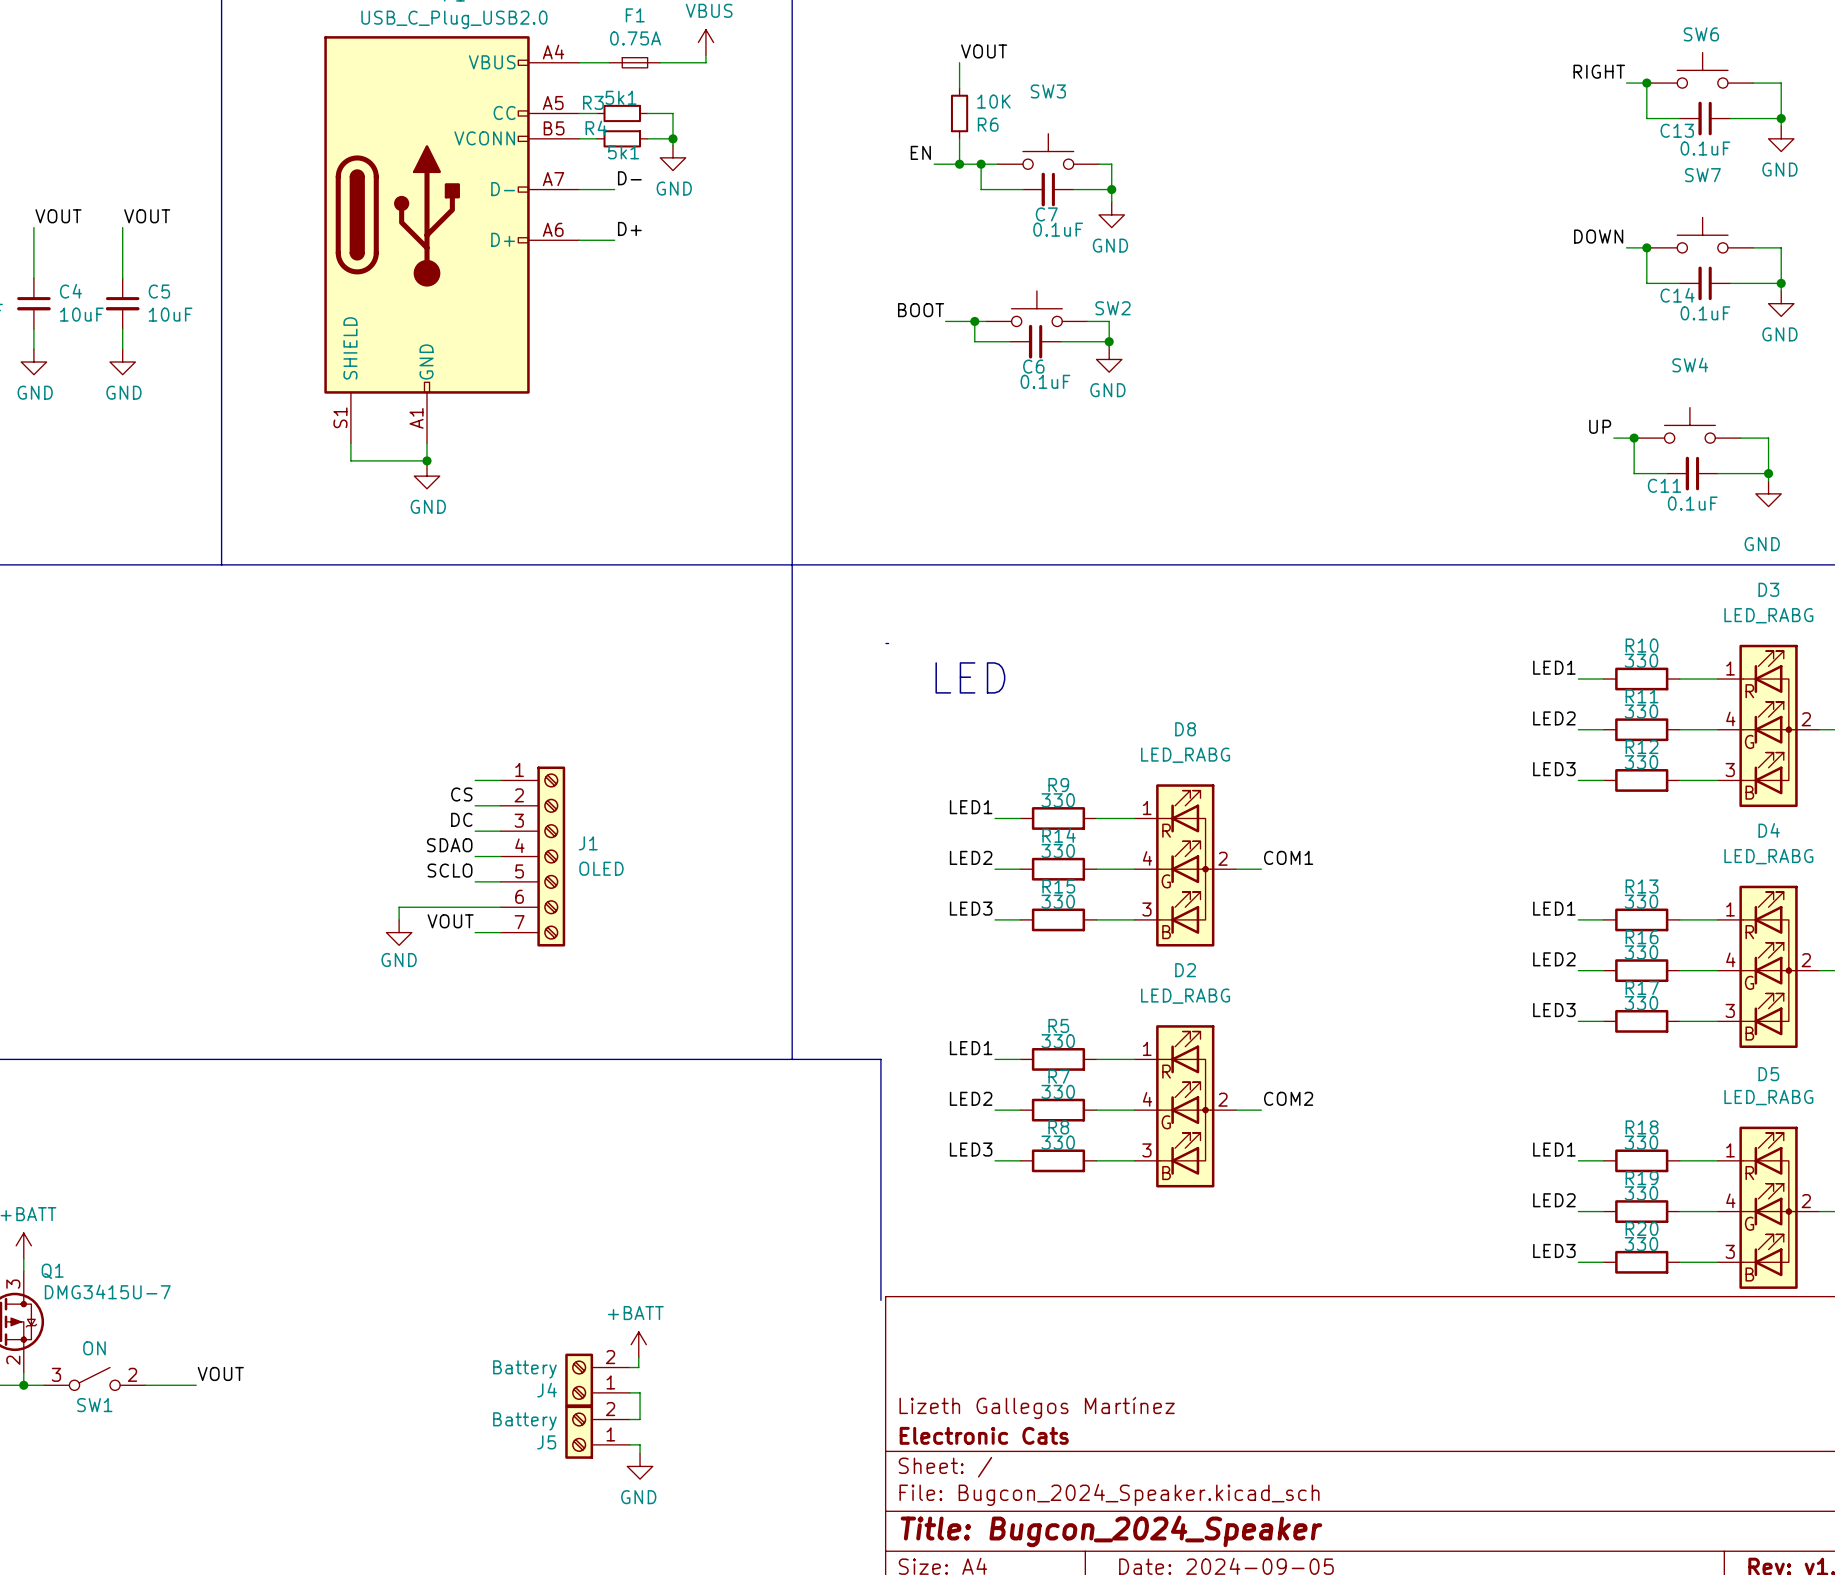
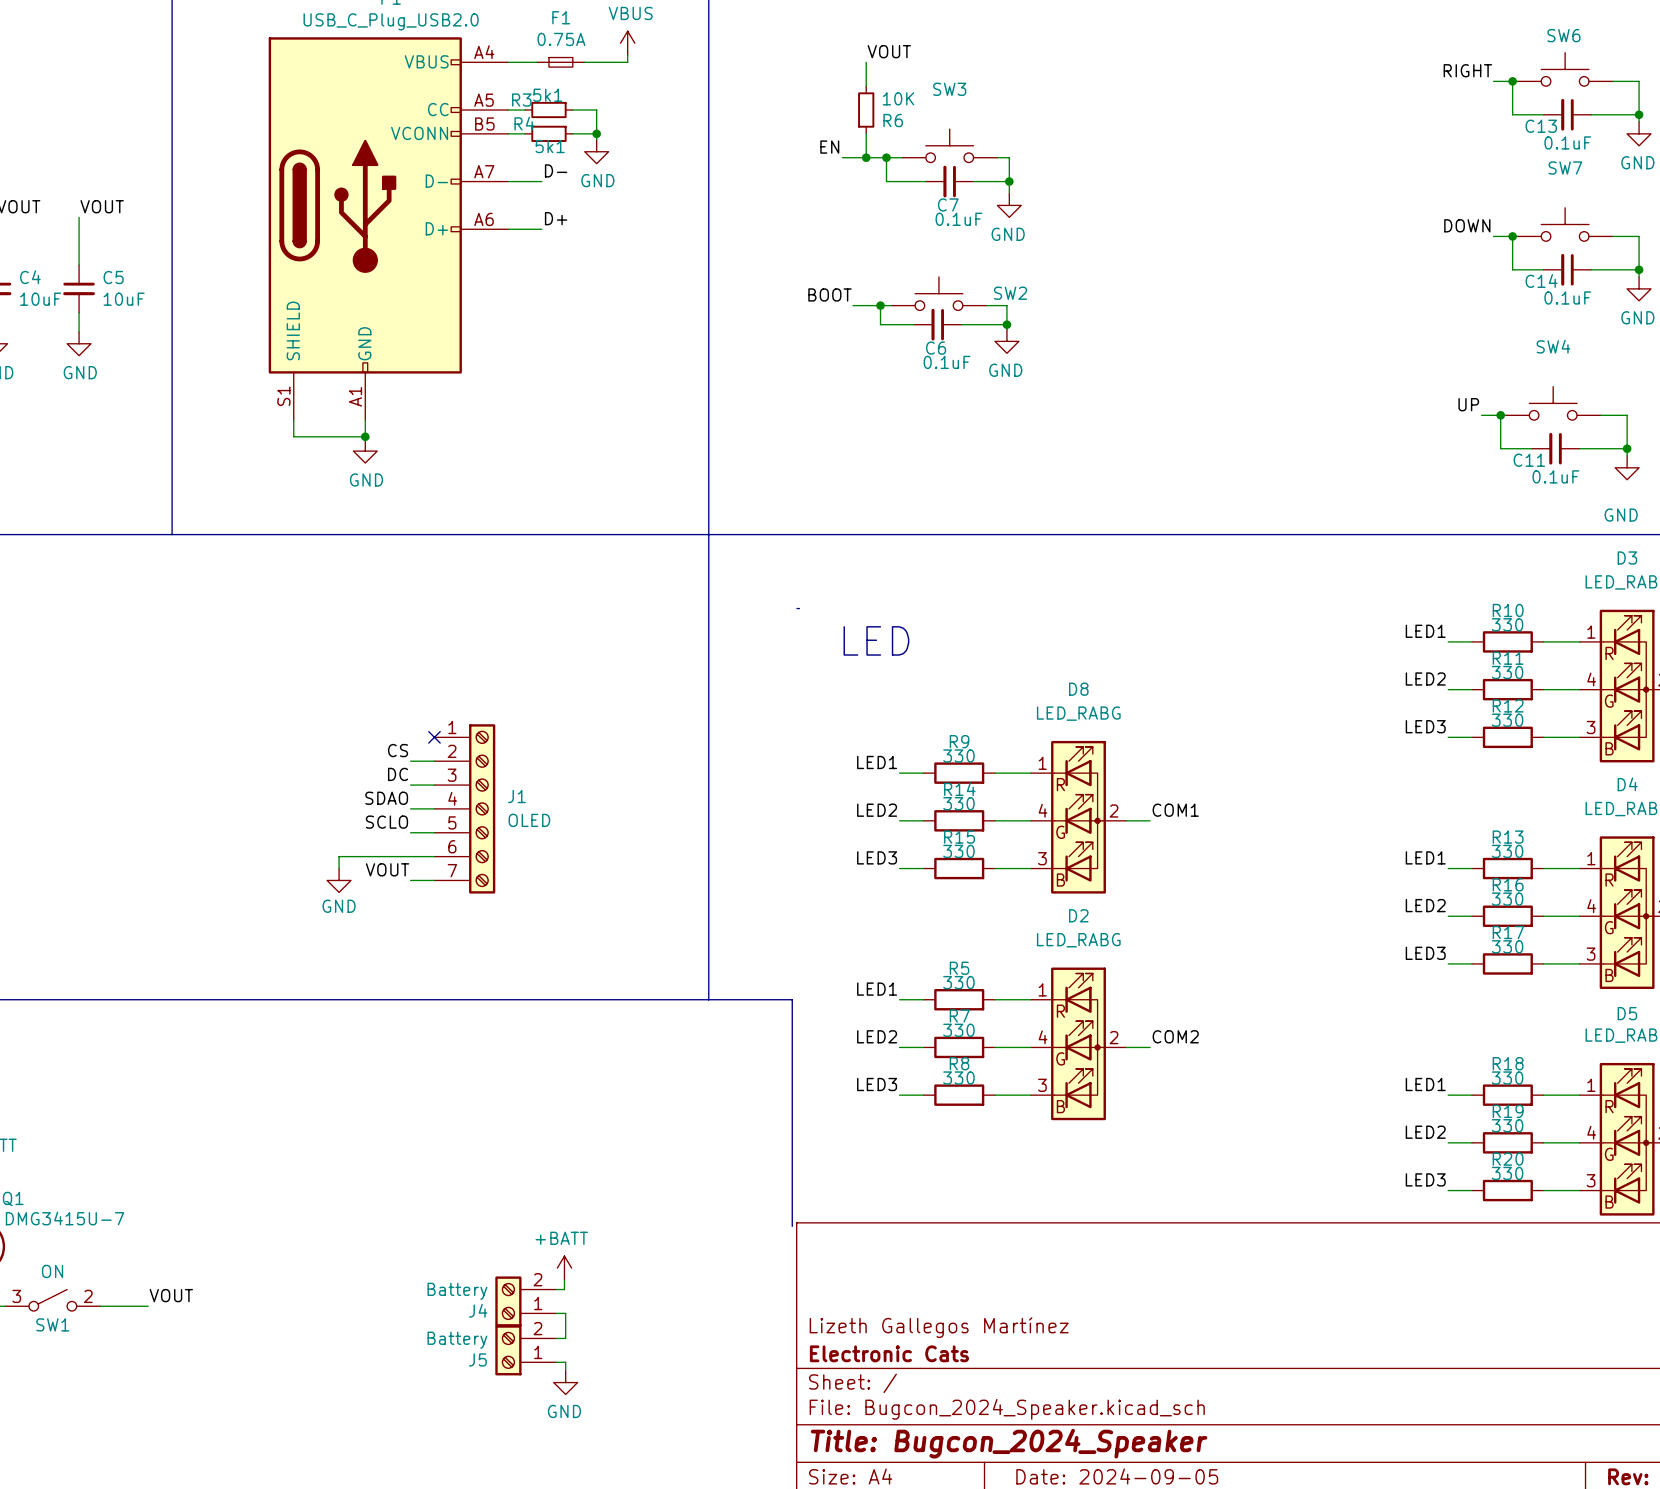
wire: (475, 780) (500, 780) -> none
no-connect mark: none -> (434, 737)

